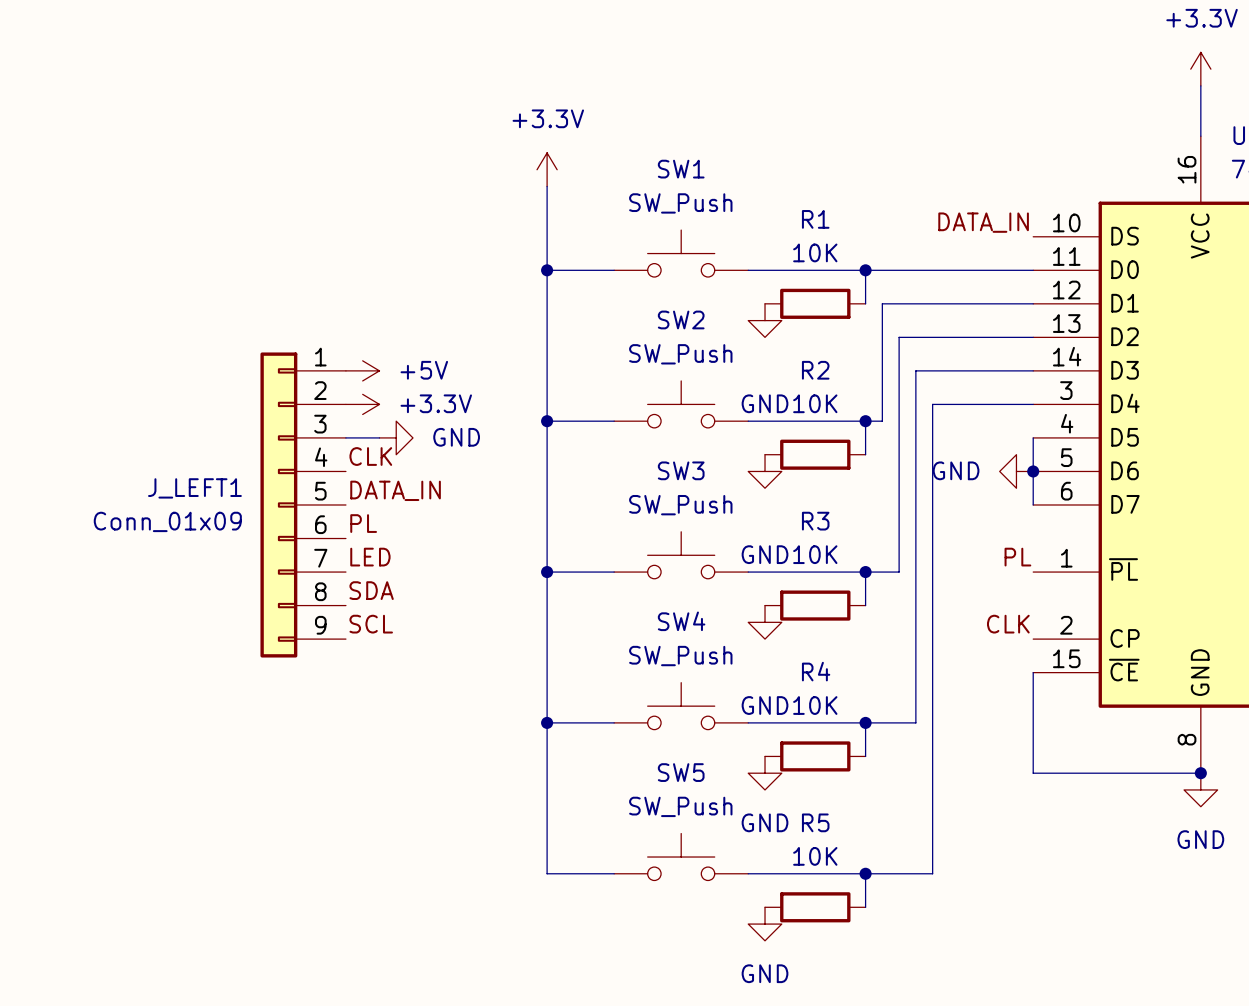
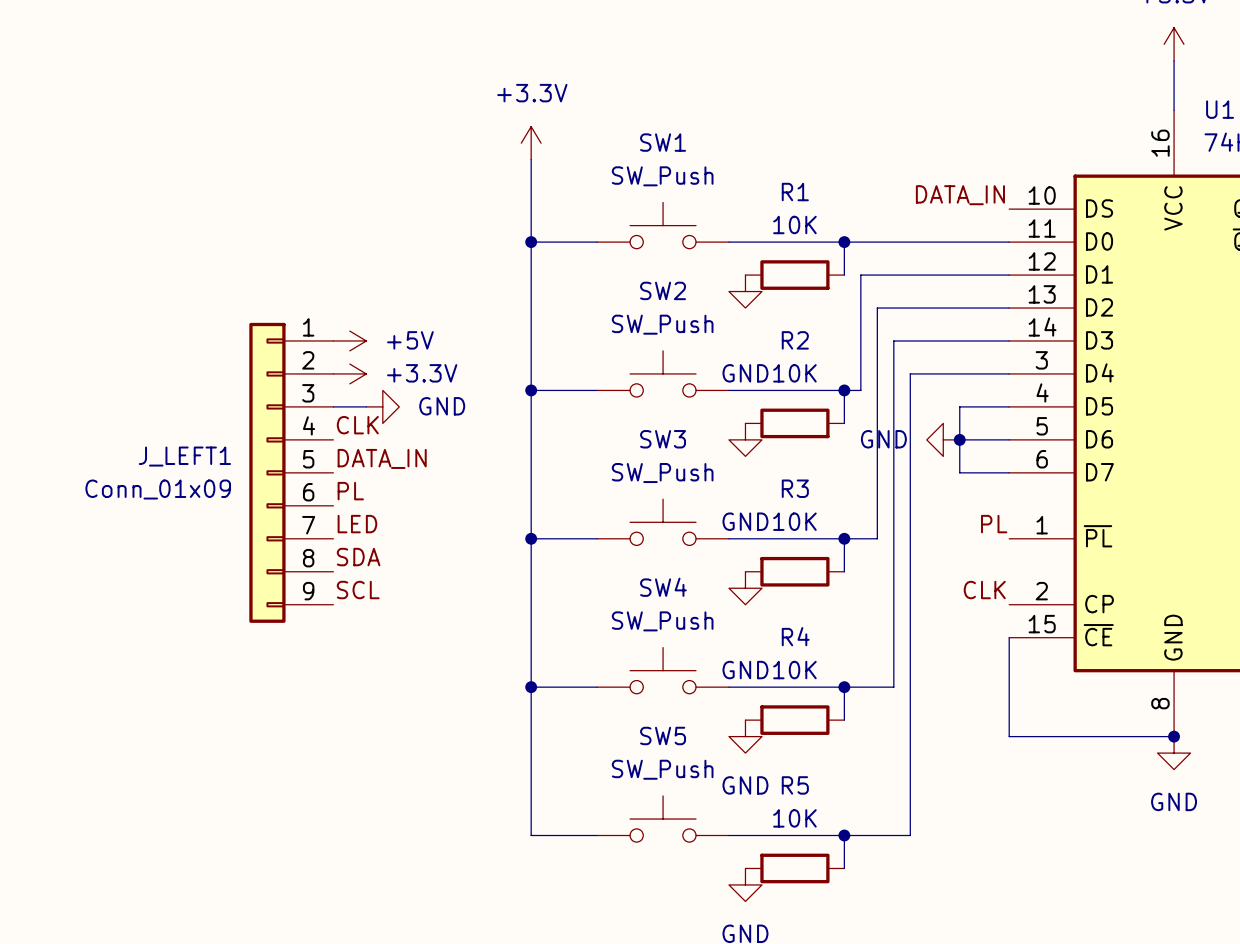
wire: (1033, 437) (1033, 504) -> (1009, 406) (959, 406) (959, 472) (1009, 472)
wire: none -> (959, 439) (1009, 439)
power symbol position: GND (1016, 471) -> GND (943, 439)
junction position: (1033, 471) -> (959, 439)

